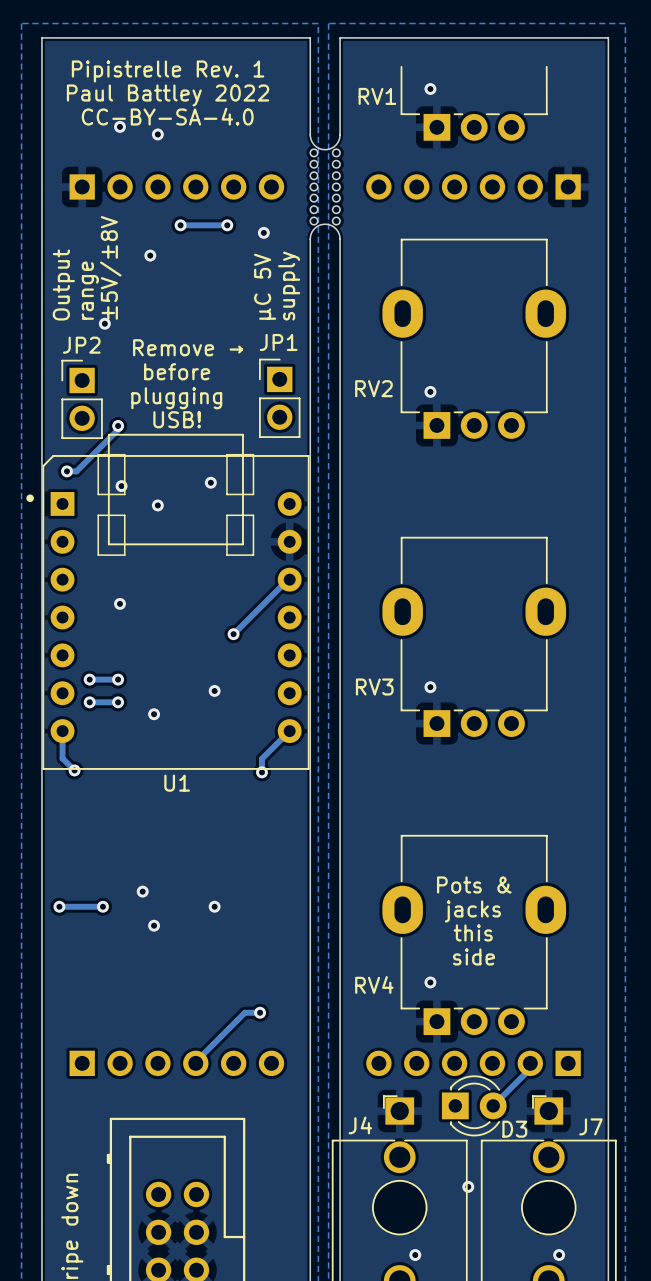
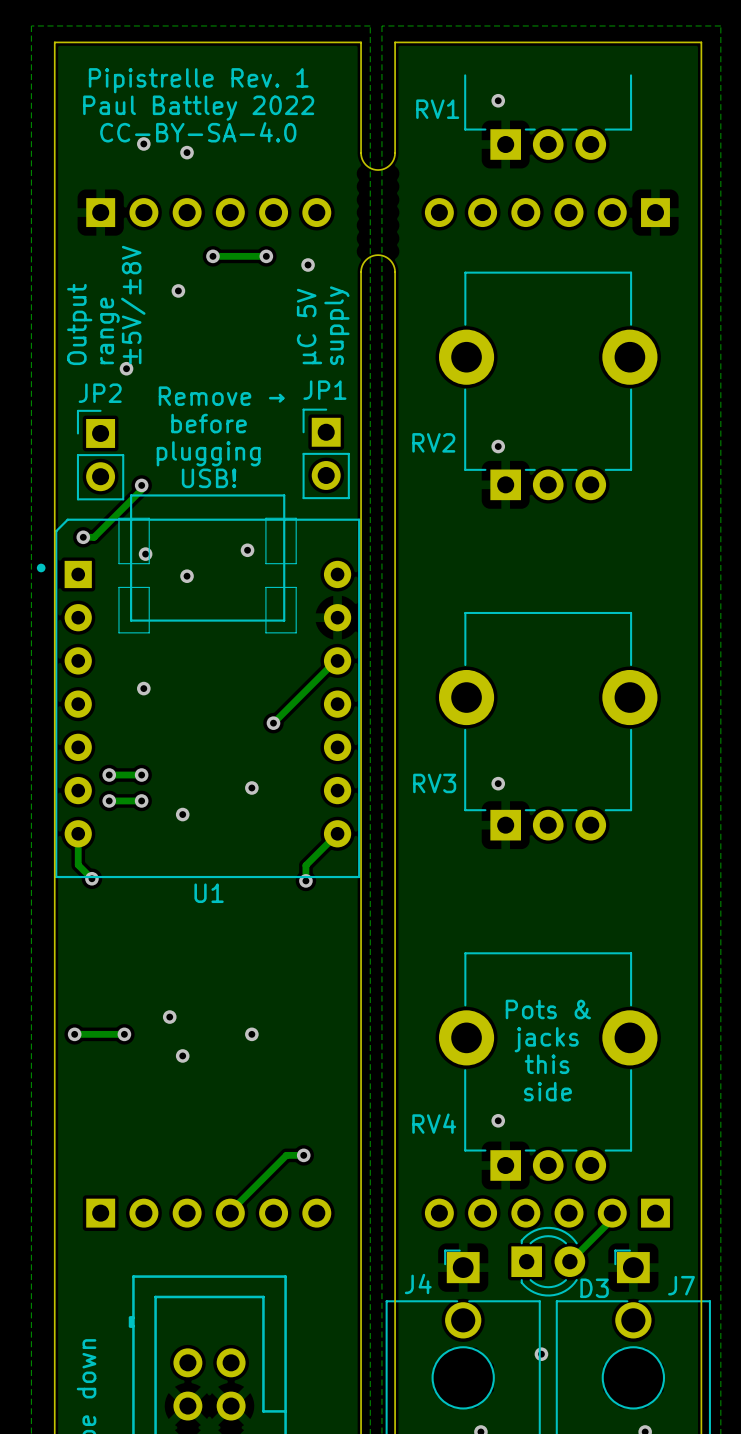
part: (325, 186) -> none
RV2 footprint: [382, 238, 567, 439] -> [438, 271, 658, 501]
RV3 footprint: [382, 536, 567, 737] -> [438, 611, 658, 841]
RV4 footprint: [382, 834, 567, 1036] -> [438, 952, 658, 1181]

